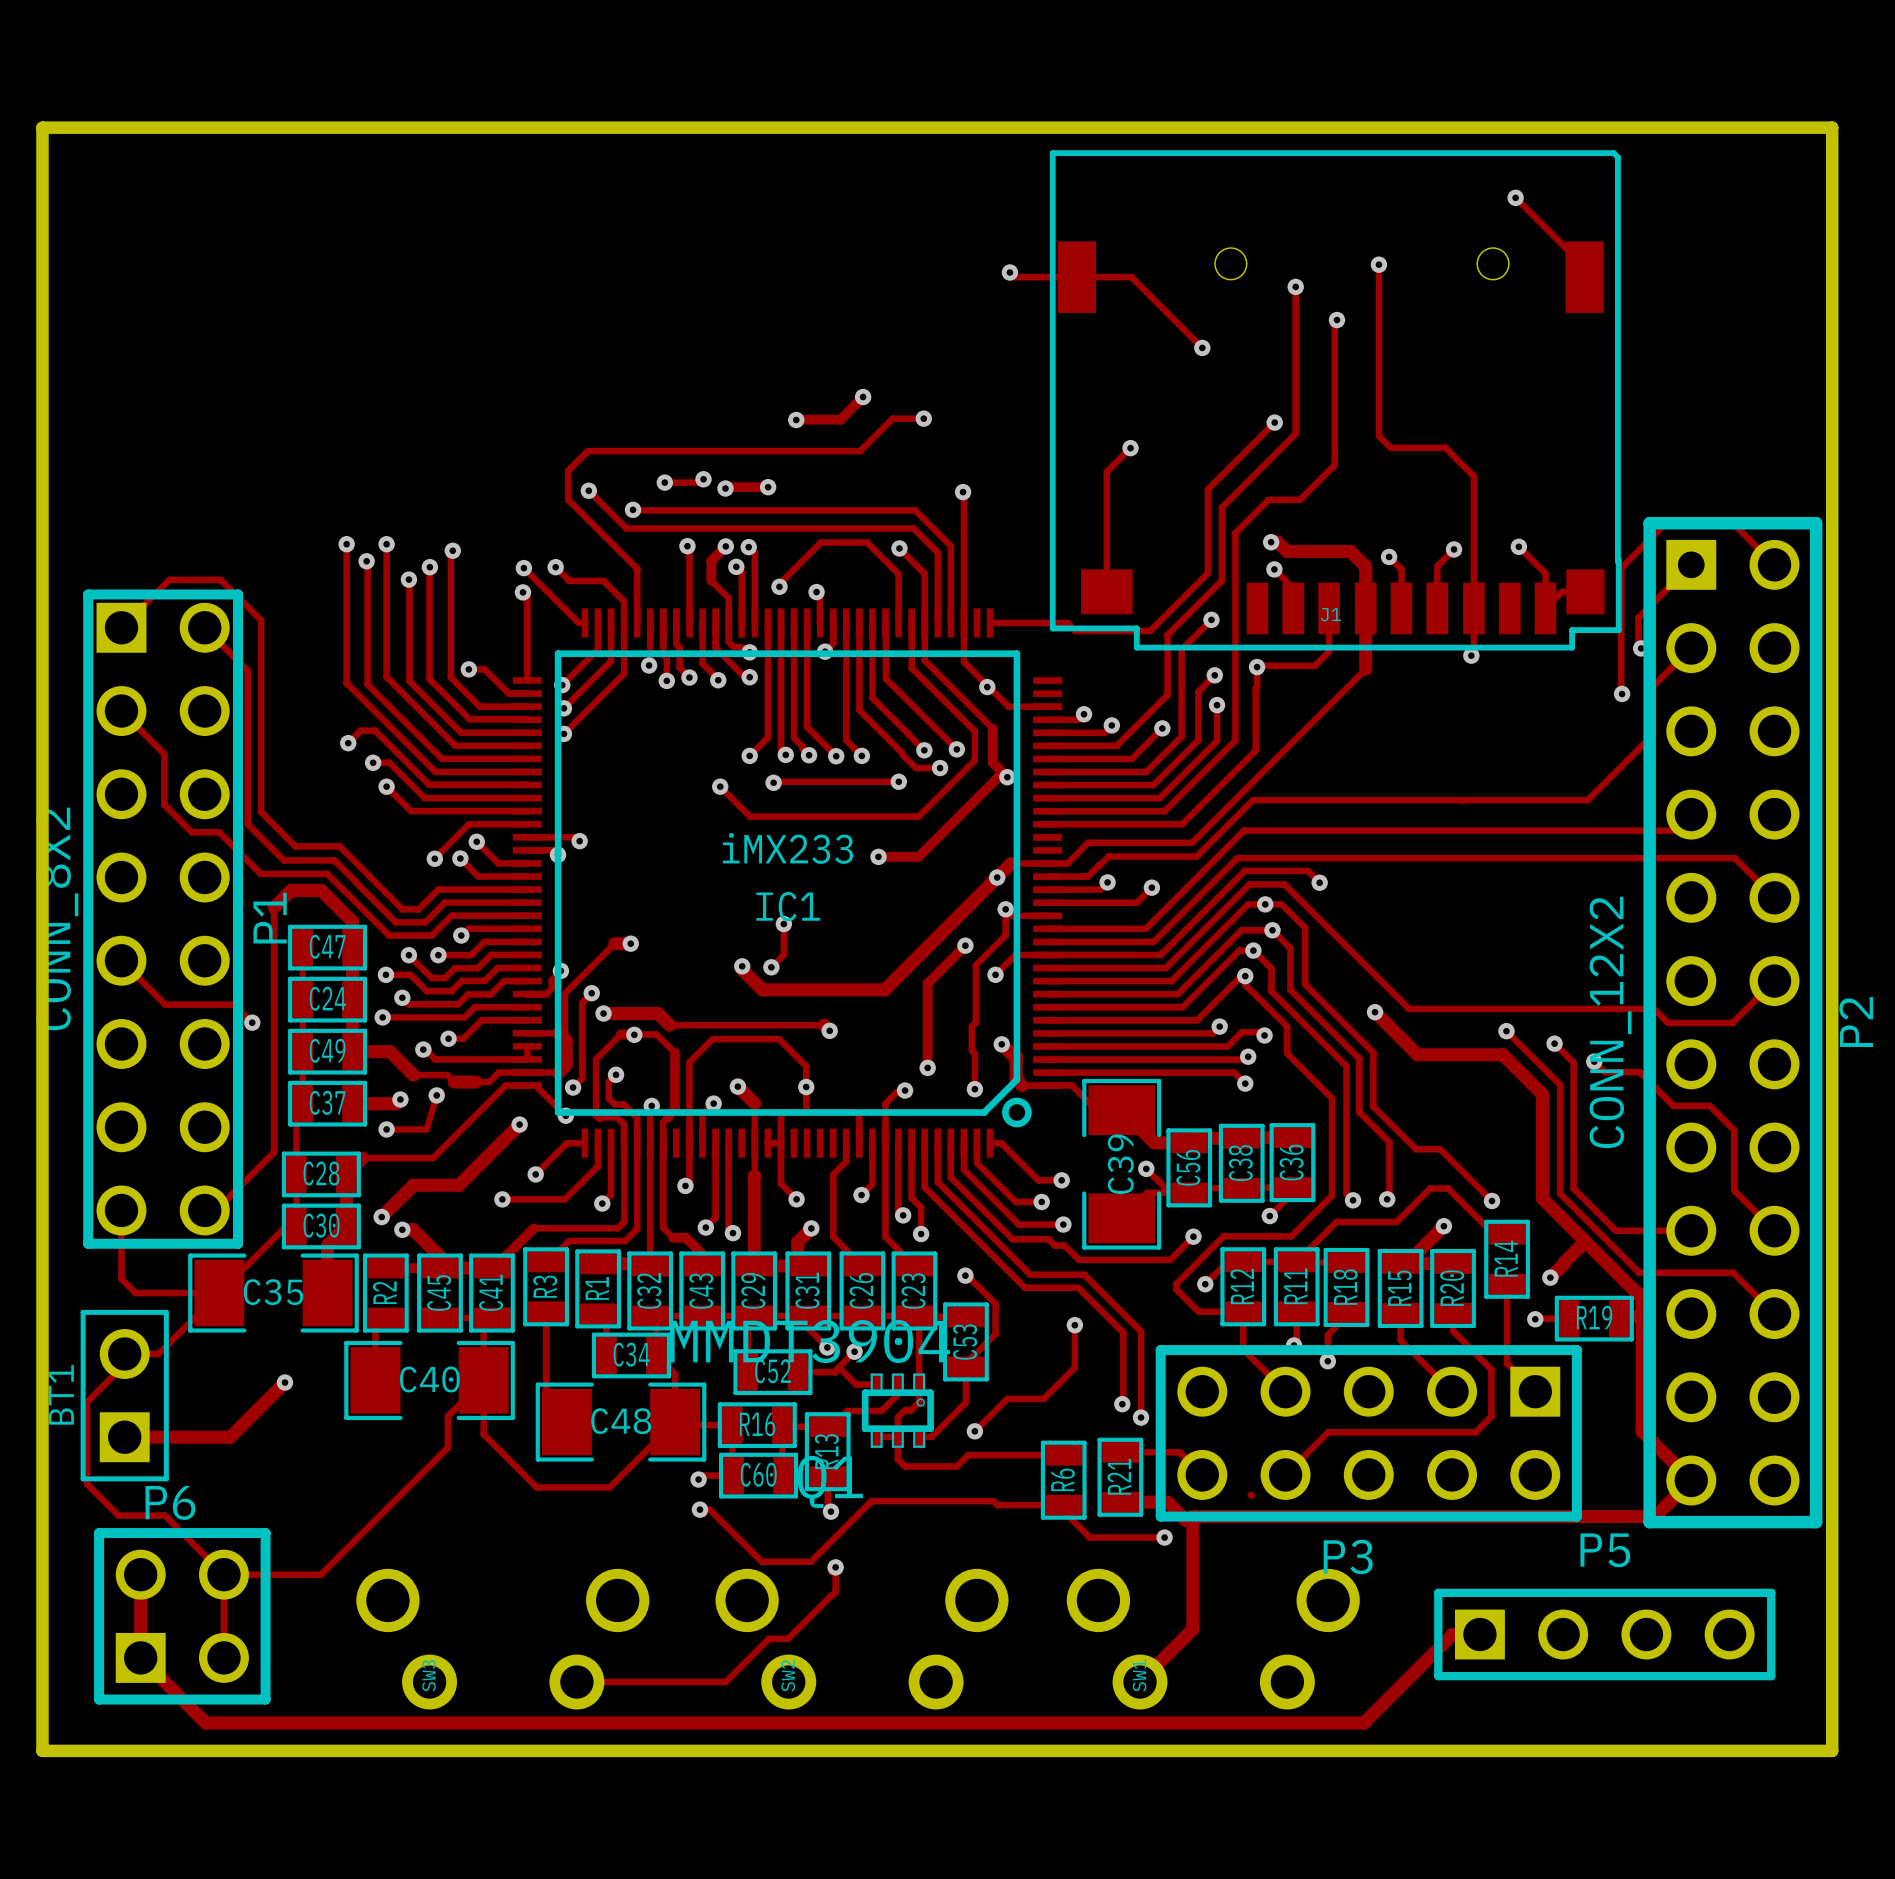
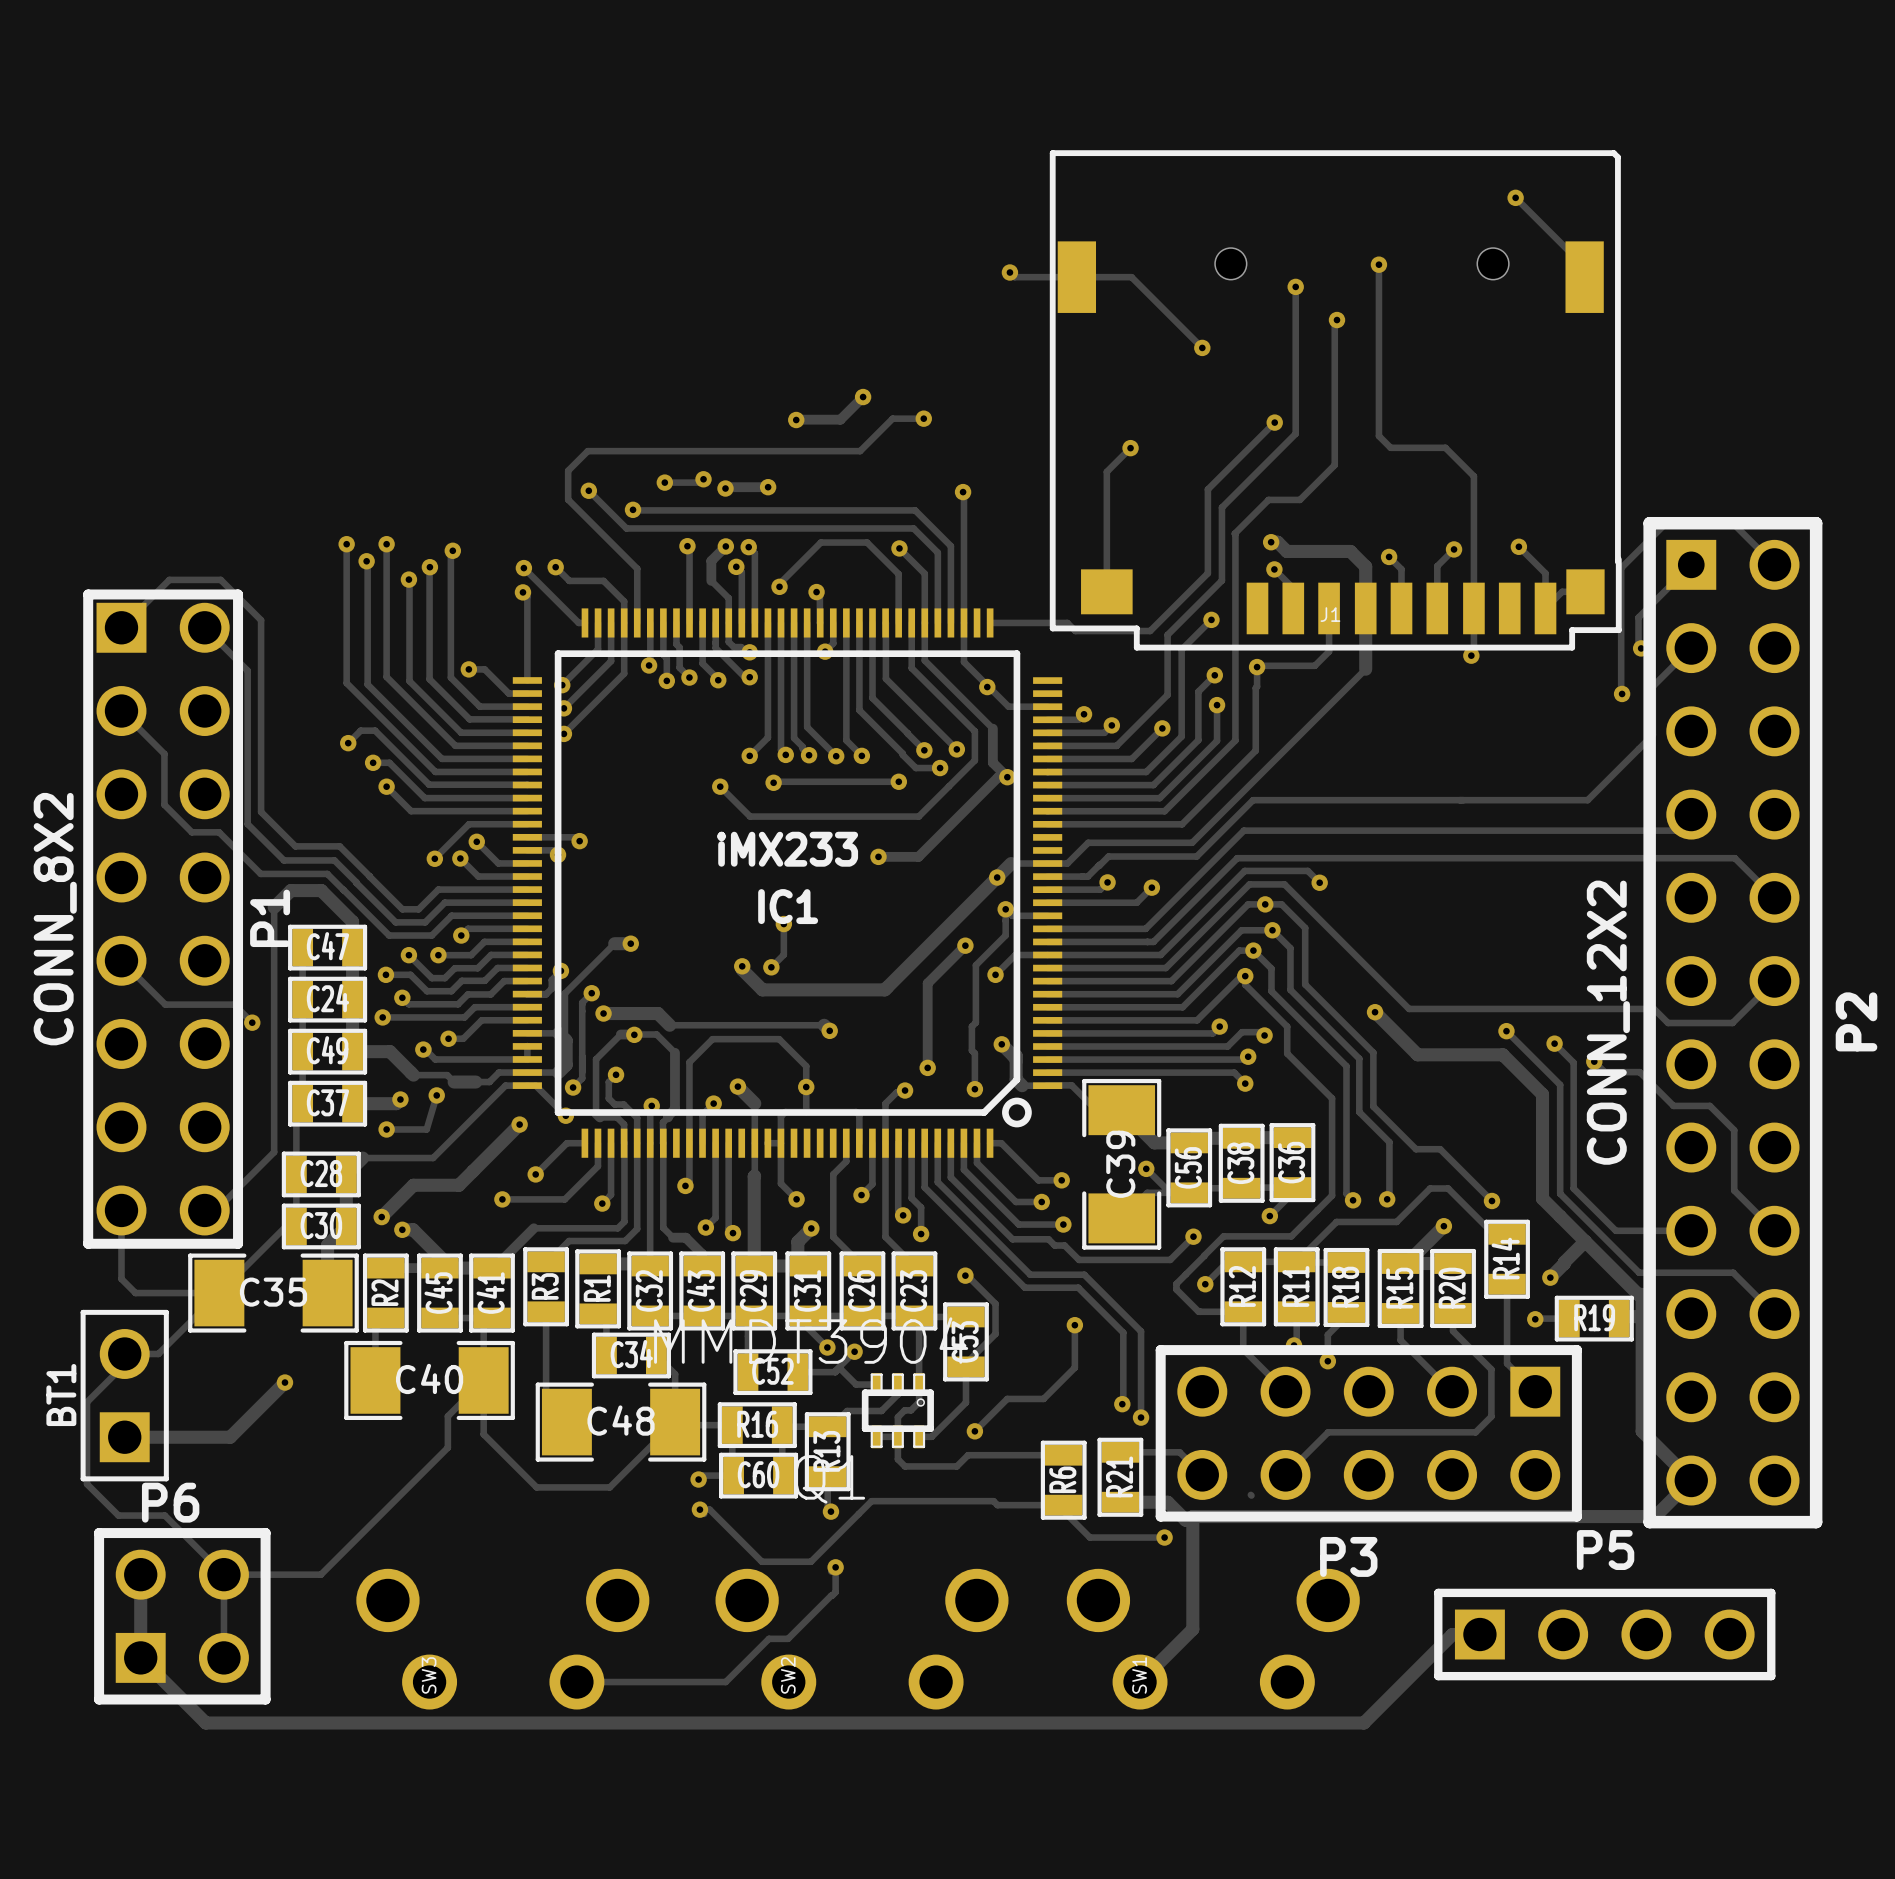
board edge: (42, 127) (42, 1750) (1832, 1750) (1832, 127) (42, 127) -> none

